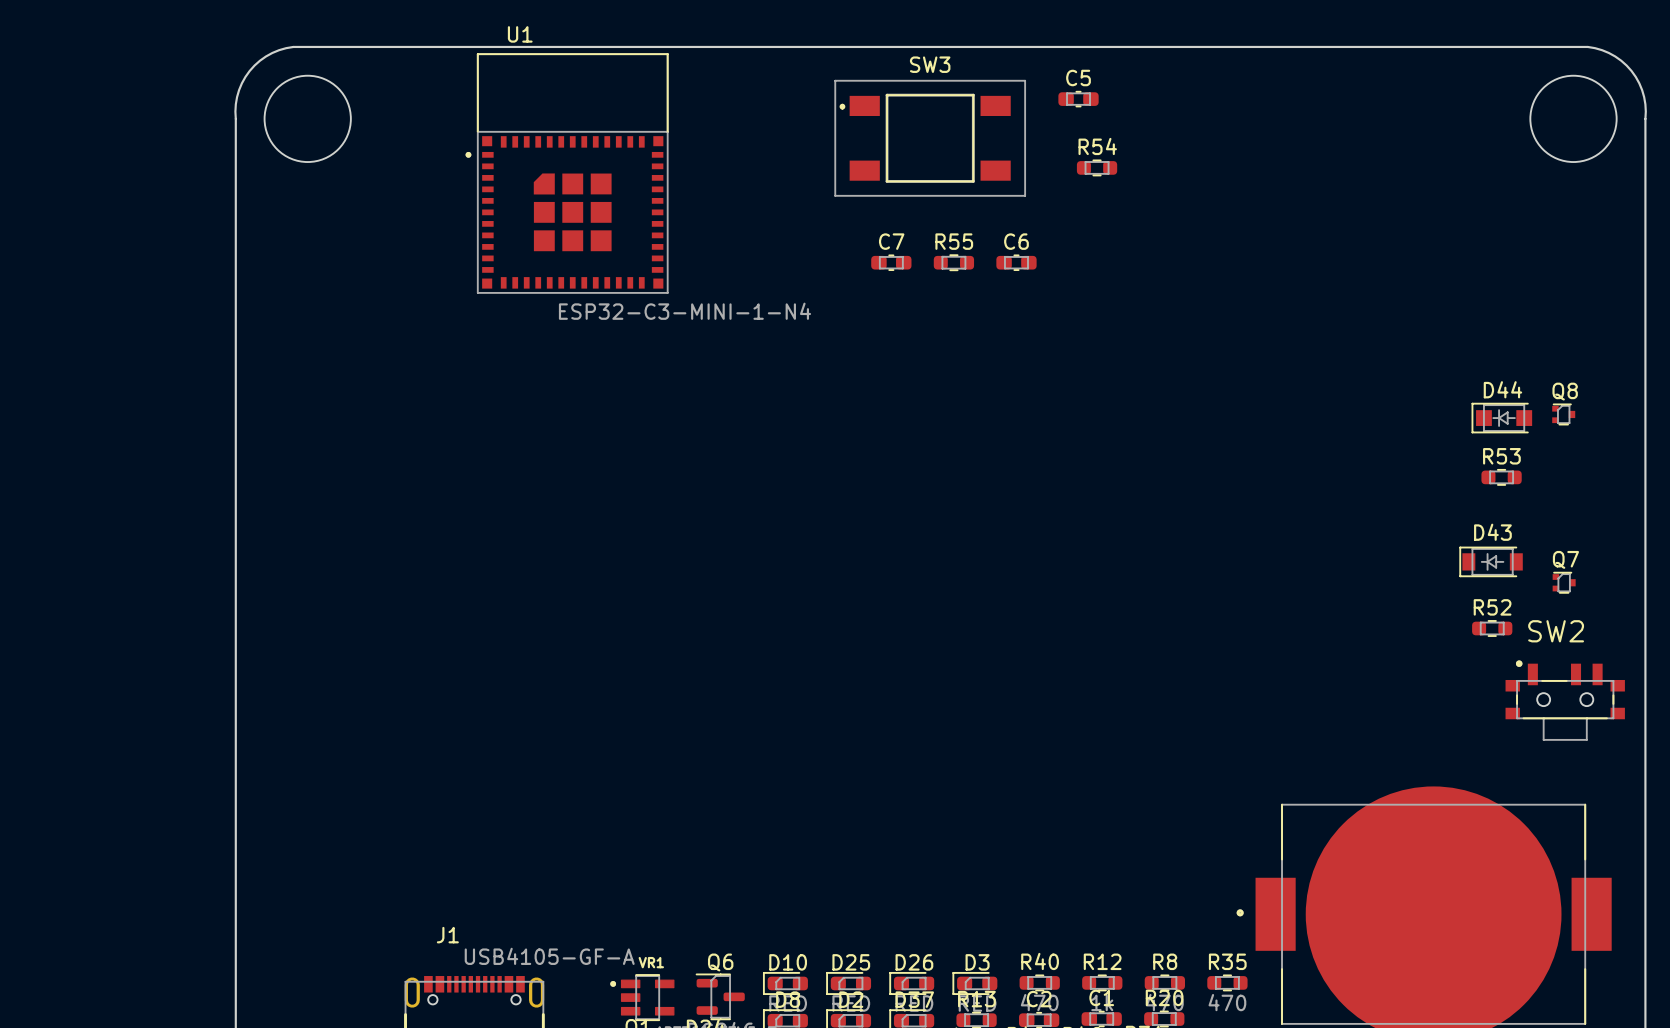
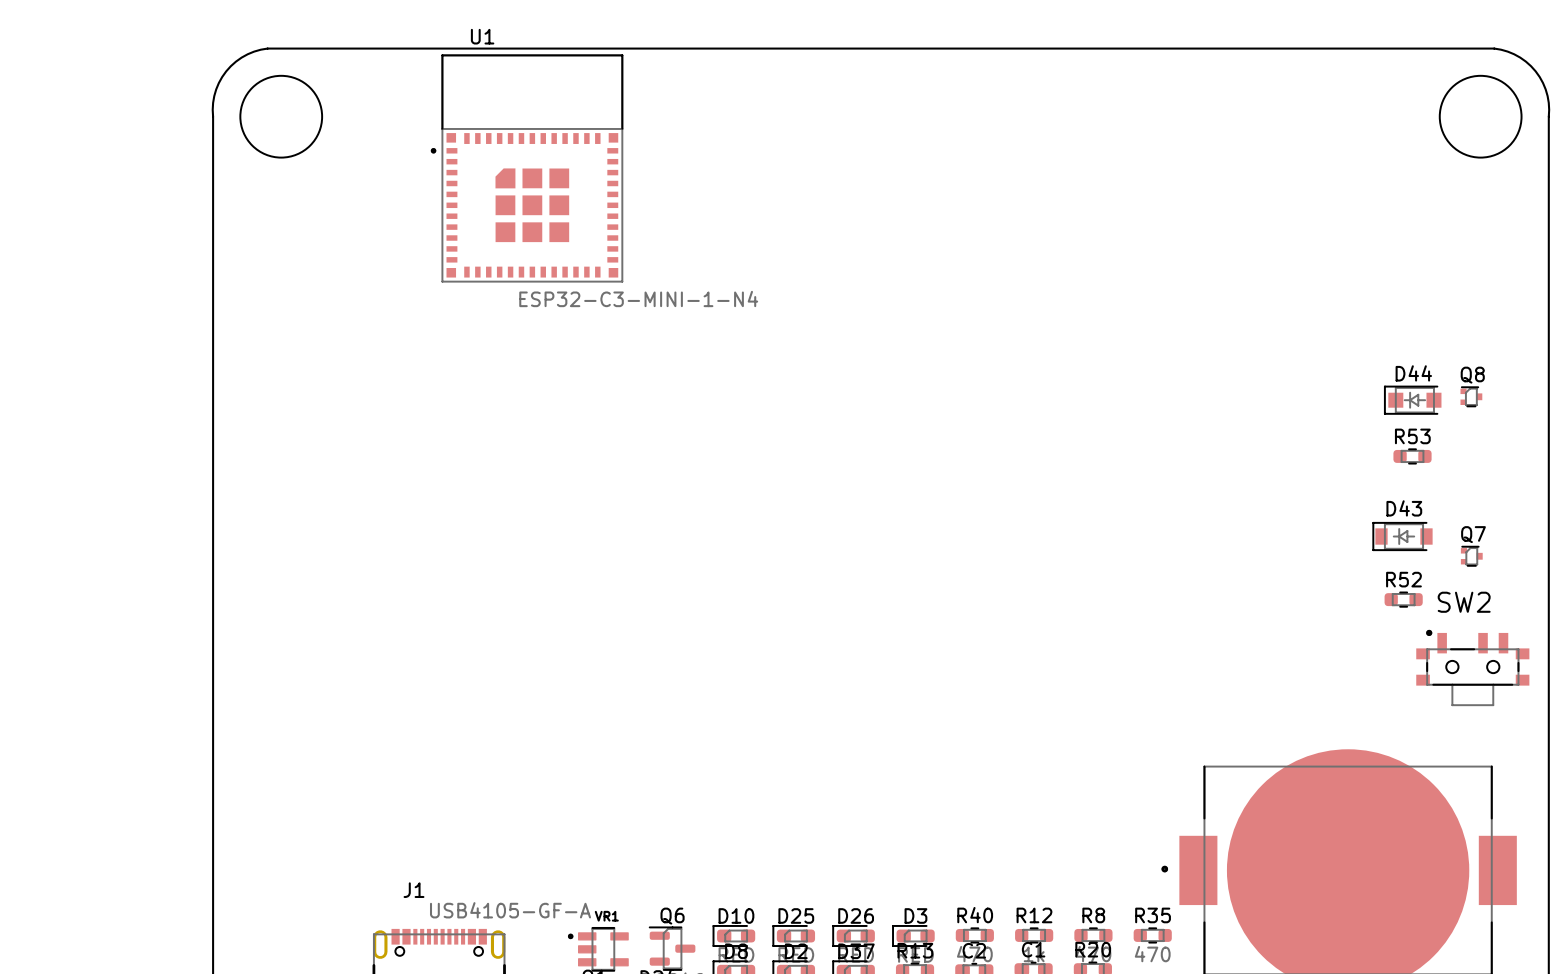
C5: (1078, 99) -> none
SW3: (930, 138) -> none
R54: (1097, 167) -> none
C7: (891, 262) -> none
R55: (953, 262) -> none
C6: (1016, 262) -> none

